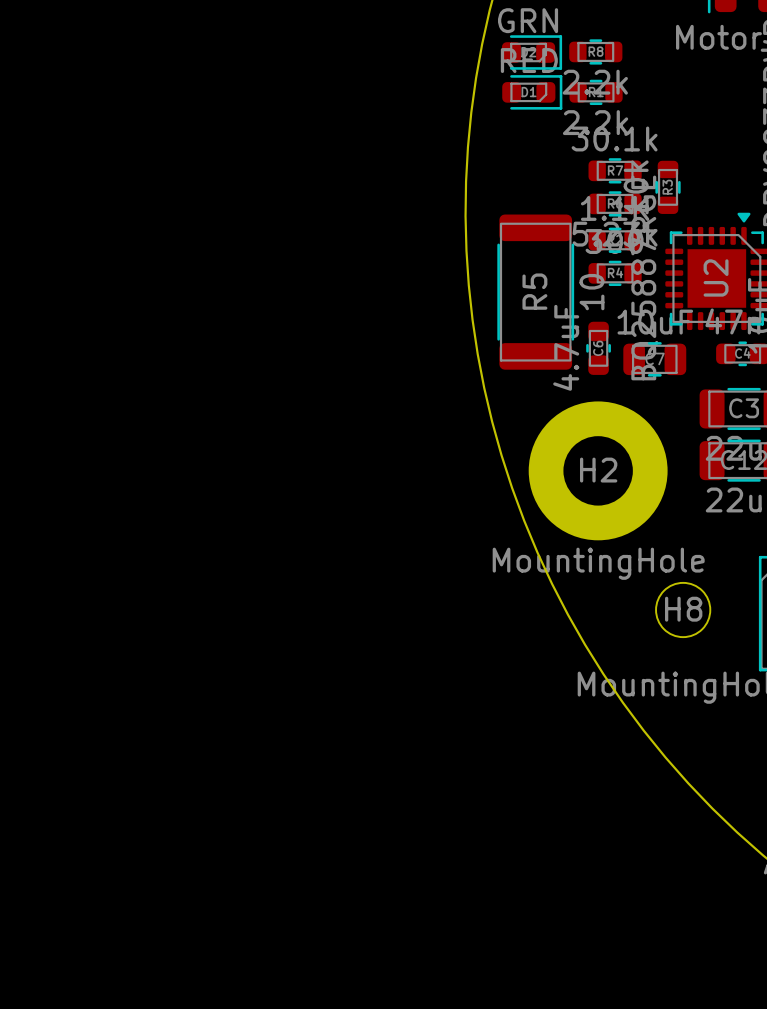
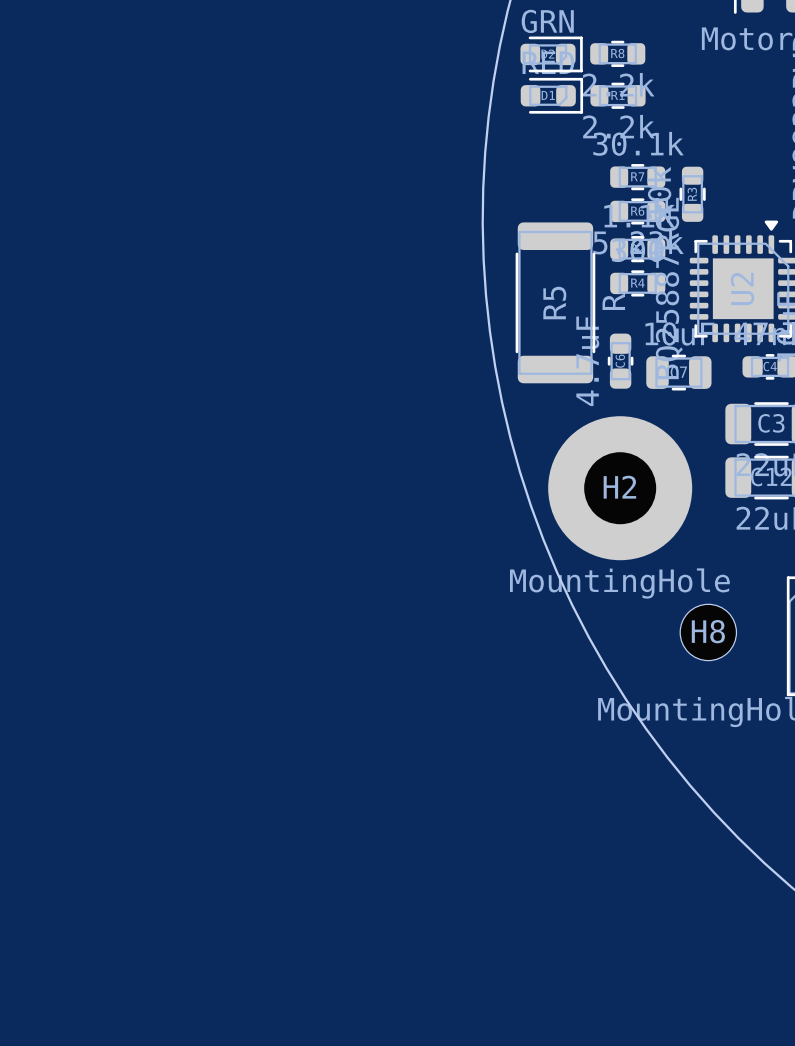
R5 value: 10 (591, 292) -> R (613, 301)

